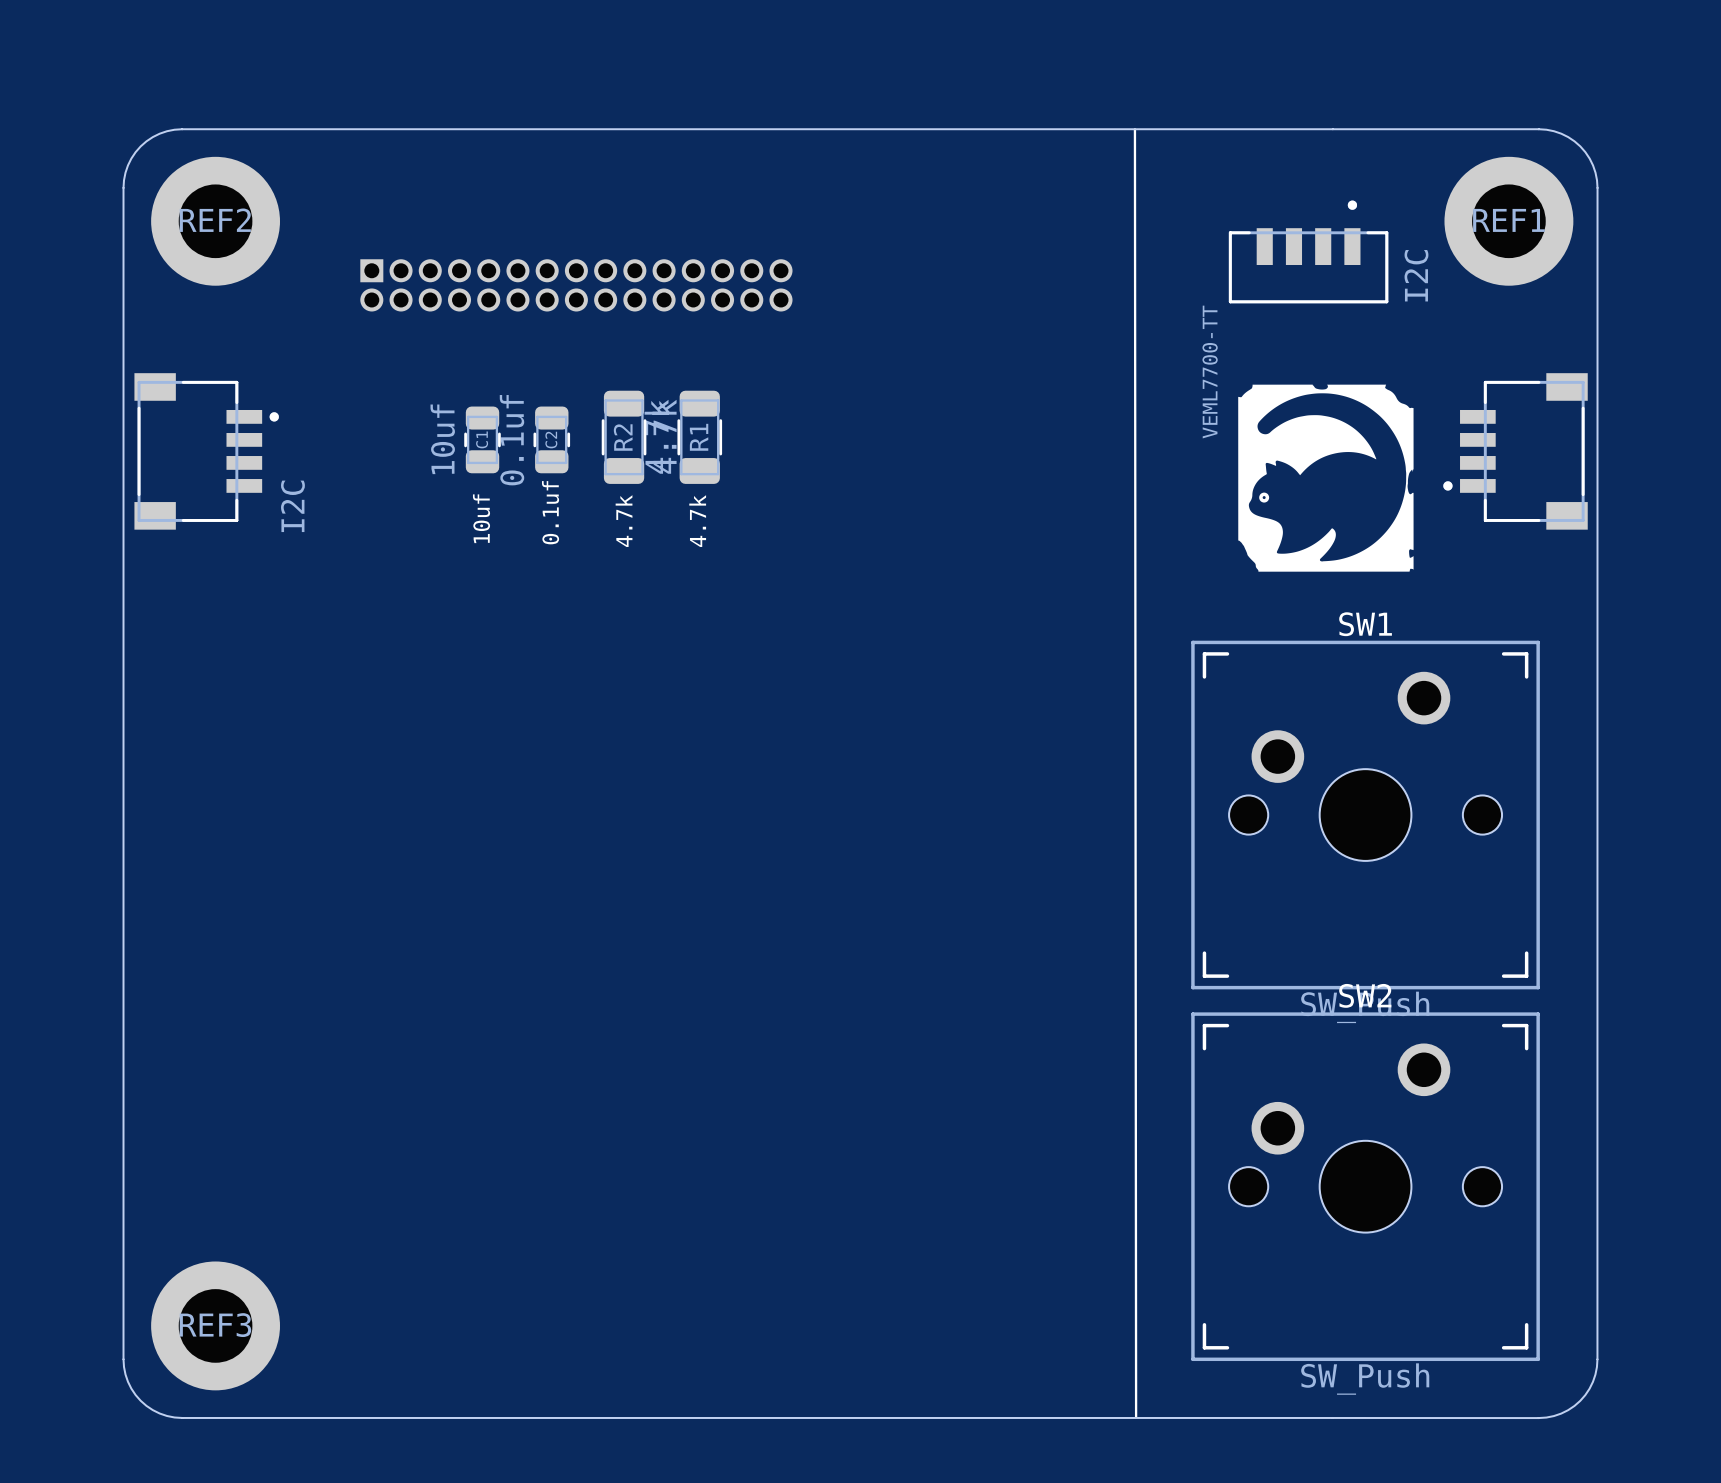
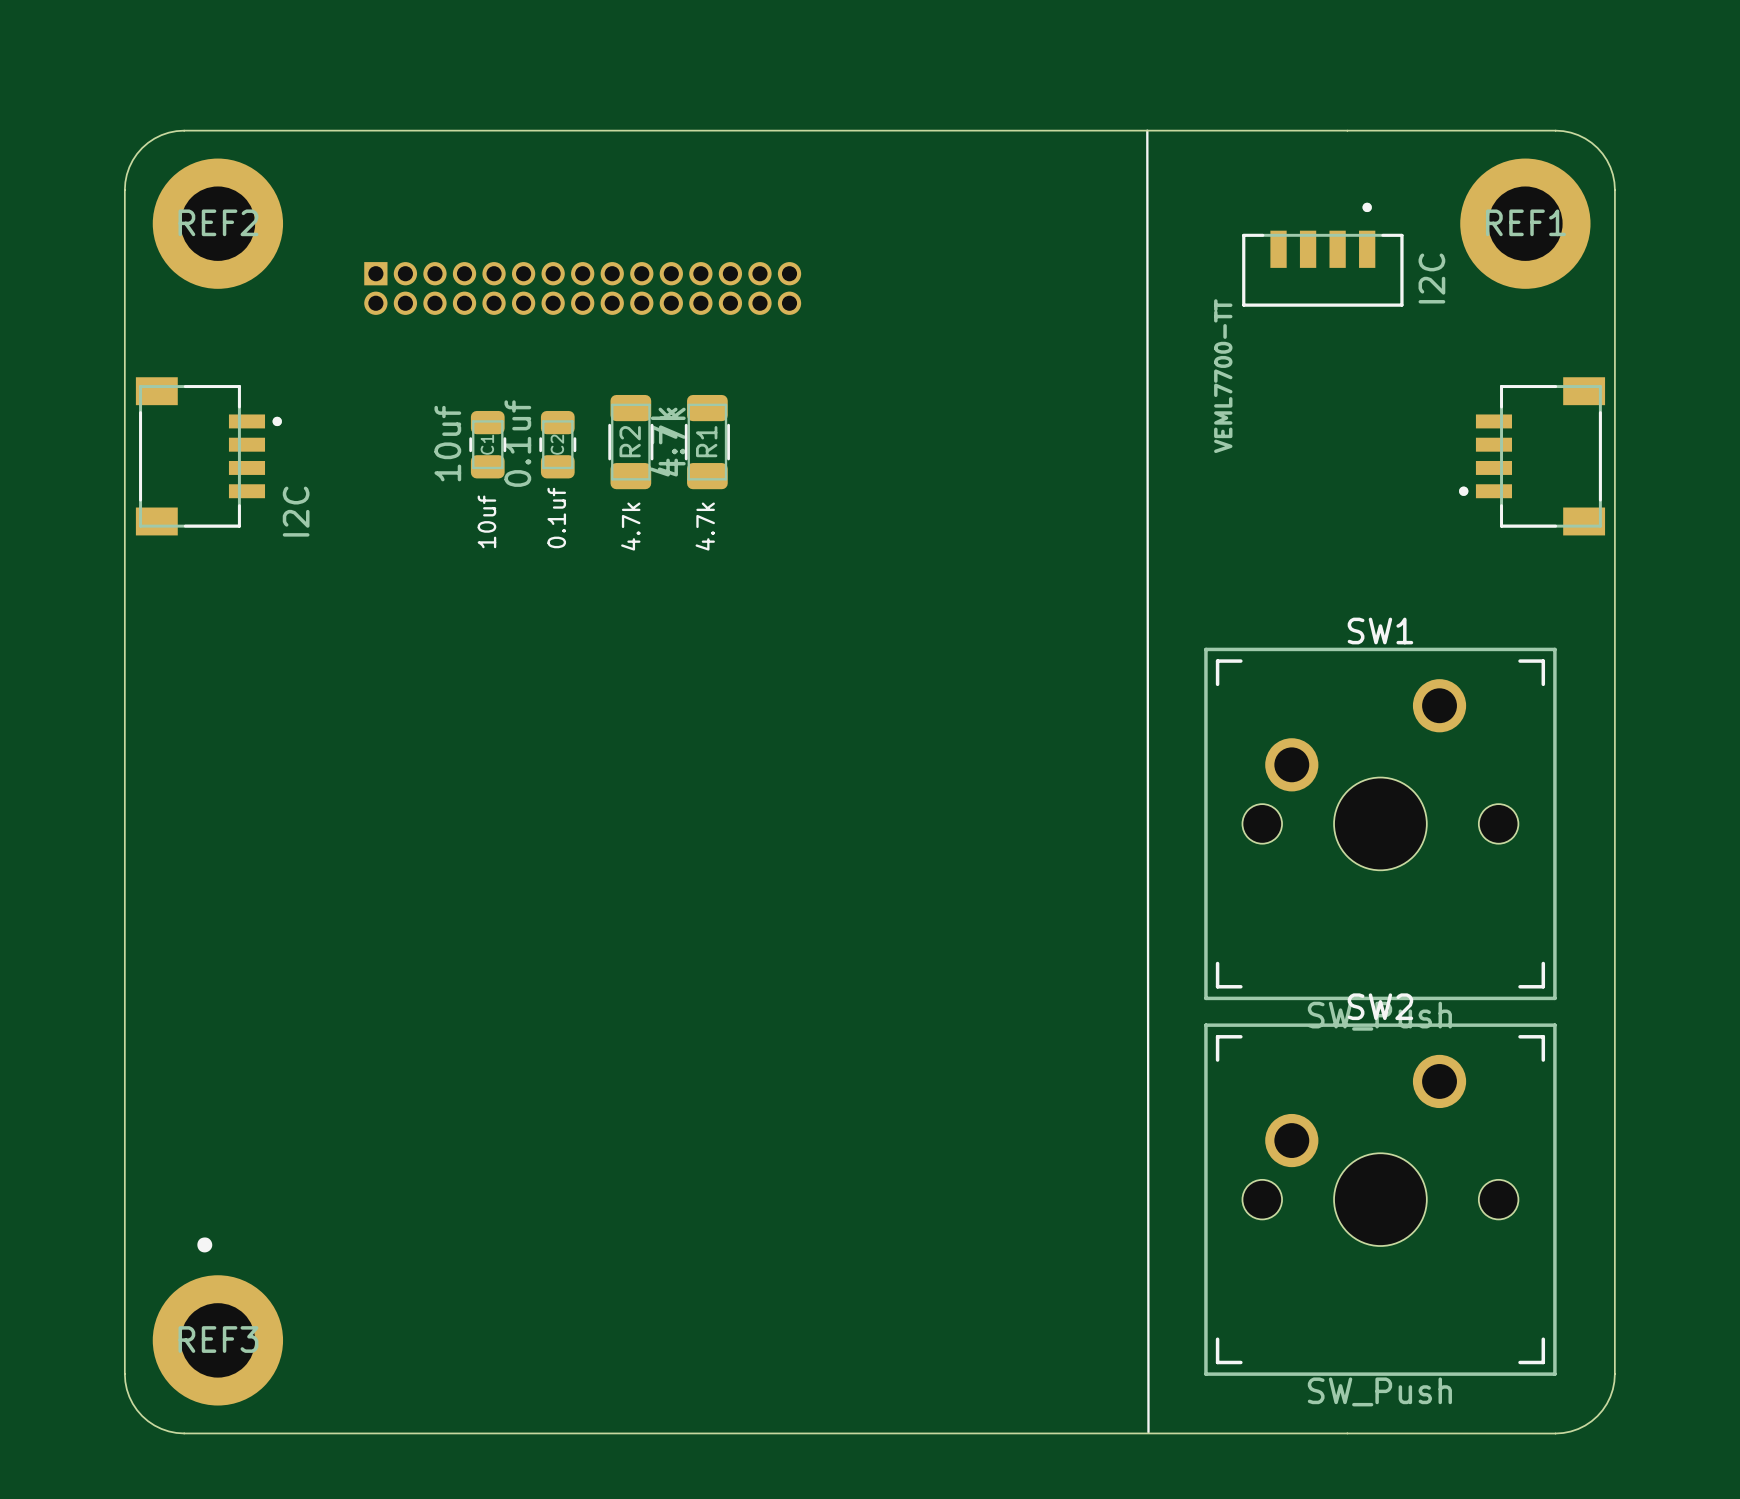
drawing: [1238, 384, 1414, 572] -> none
drawing: none -> [197, 1237, 213, 1253]

